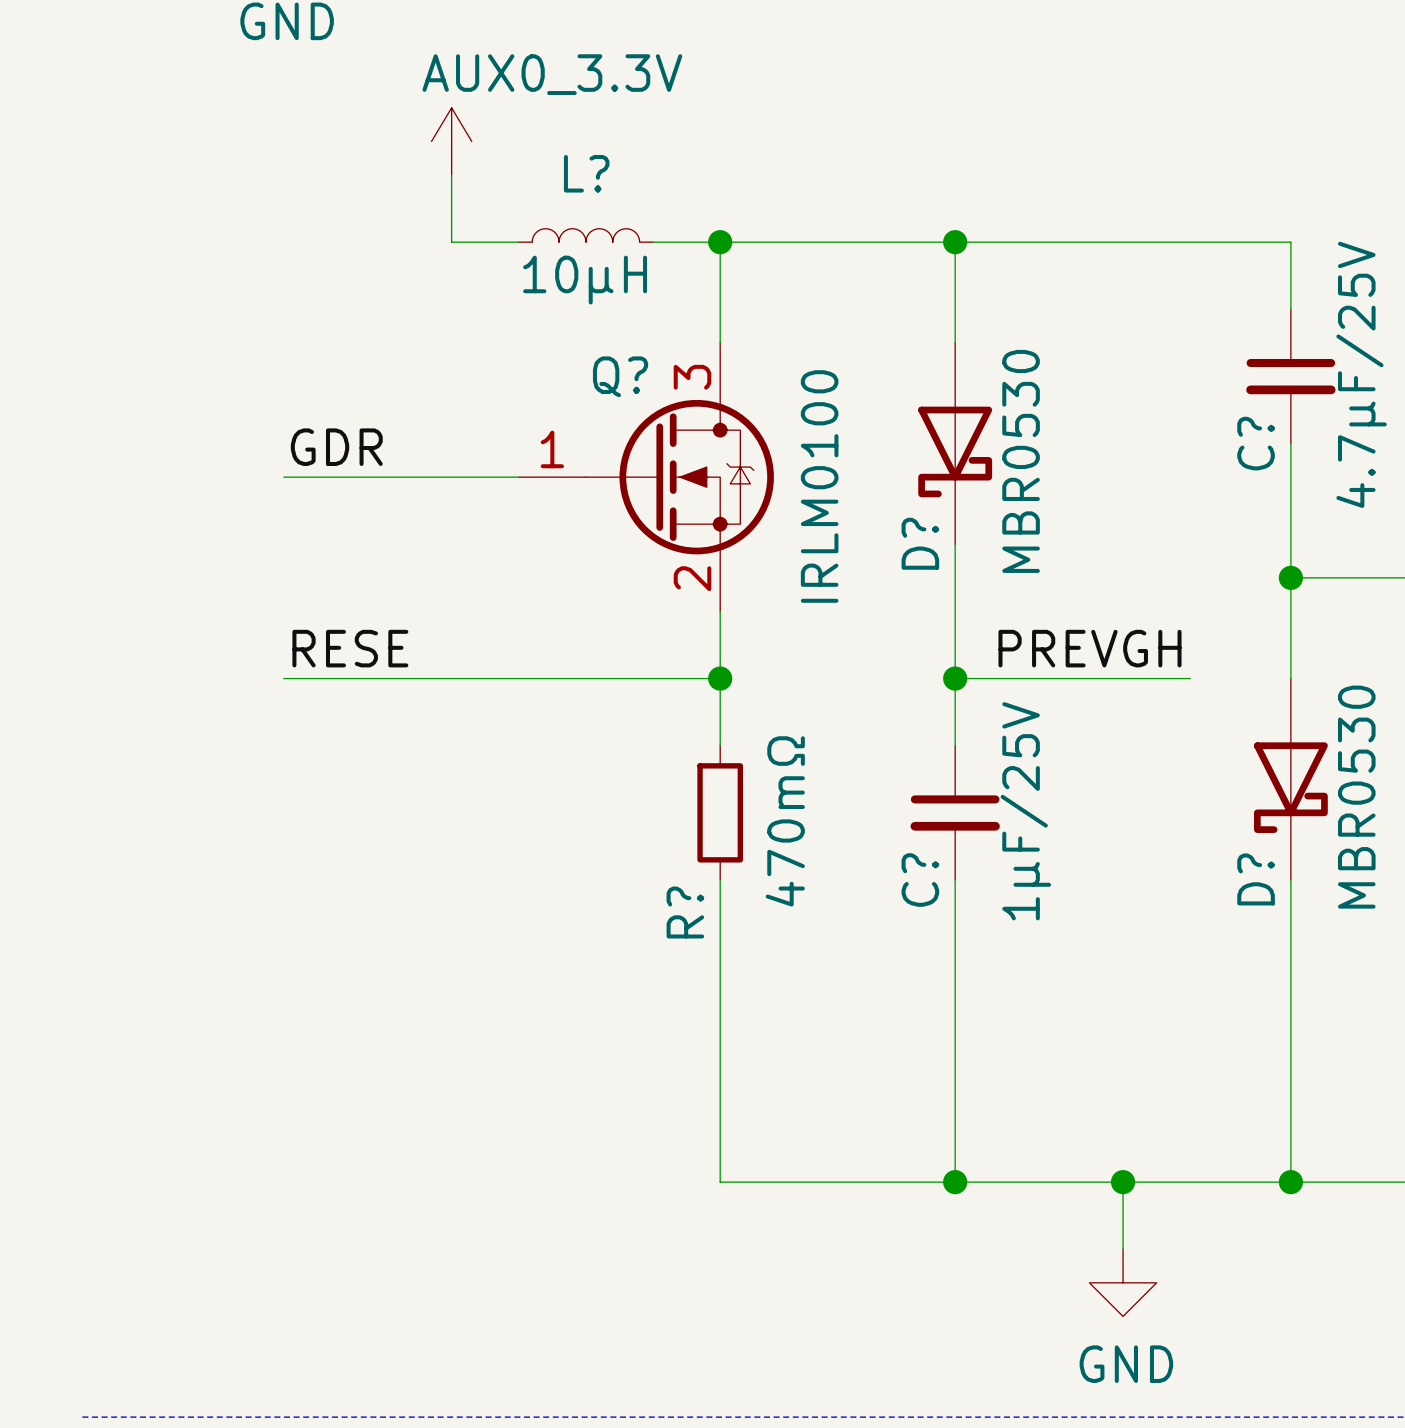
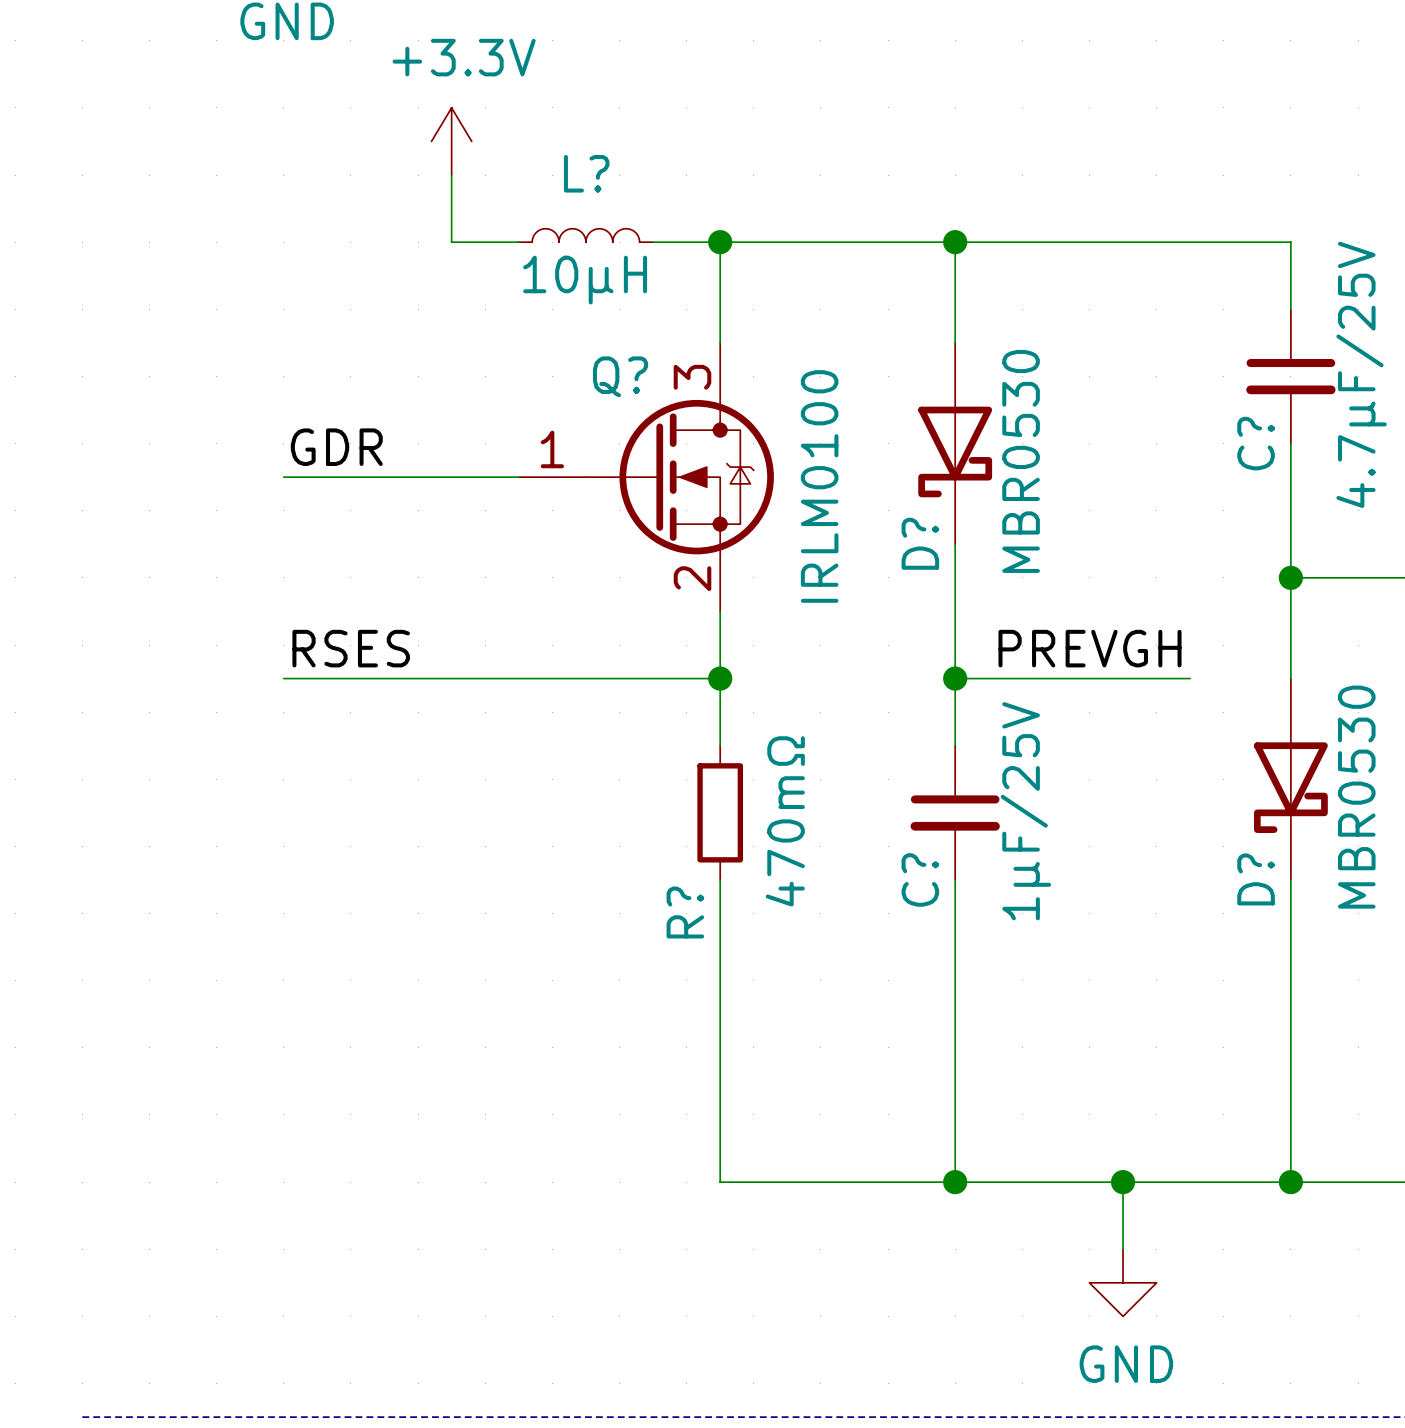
power symbol: AUX0_3.3V (451, 141) -> +3.3V (451, 141)
label: RESE (350, 648) -> RSES (351, 648)

